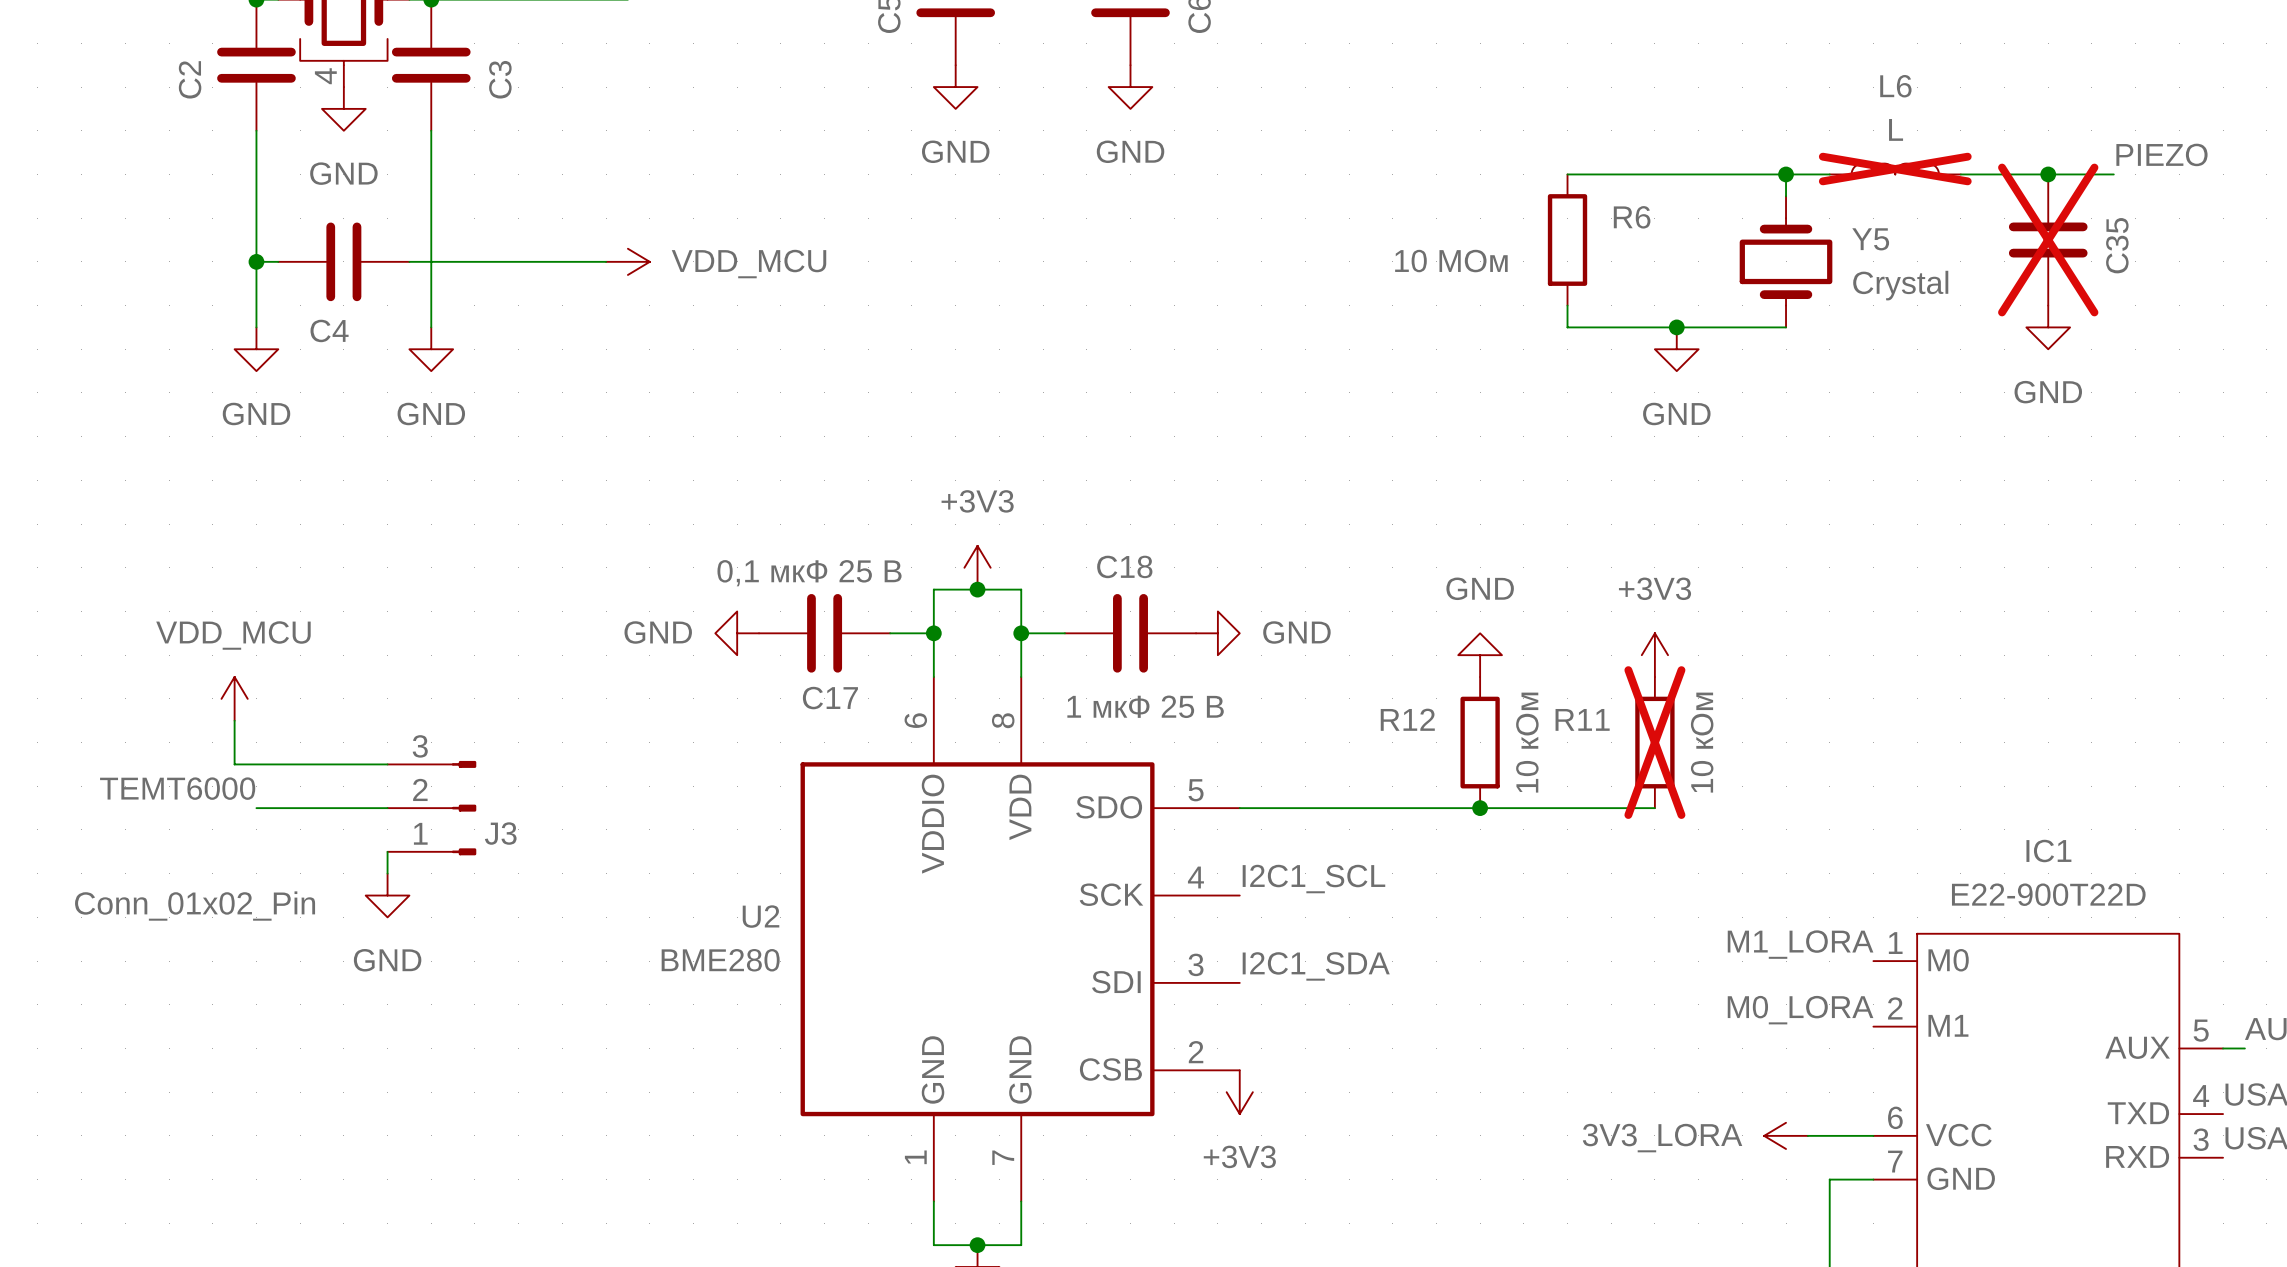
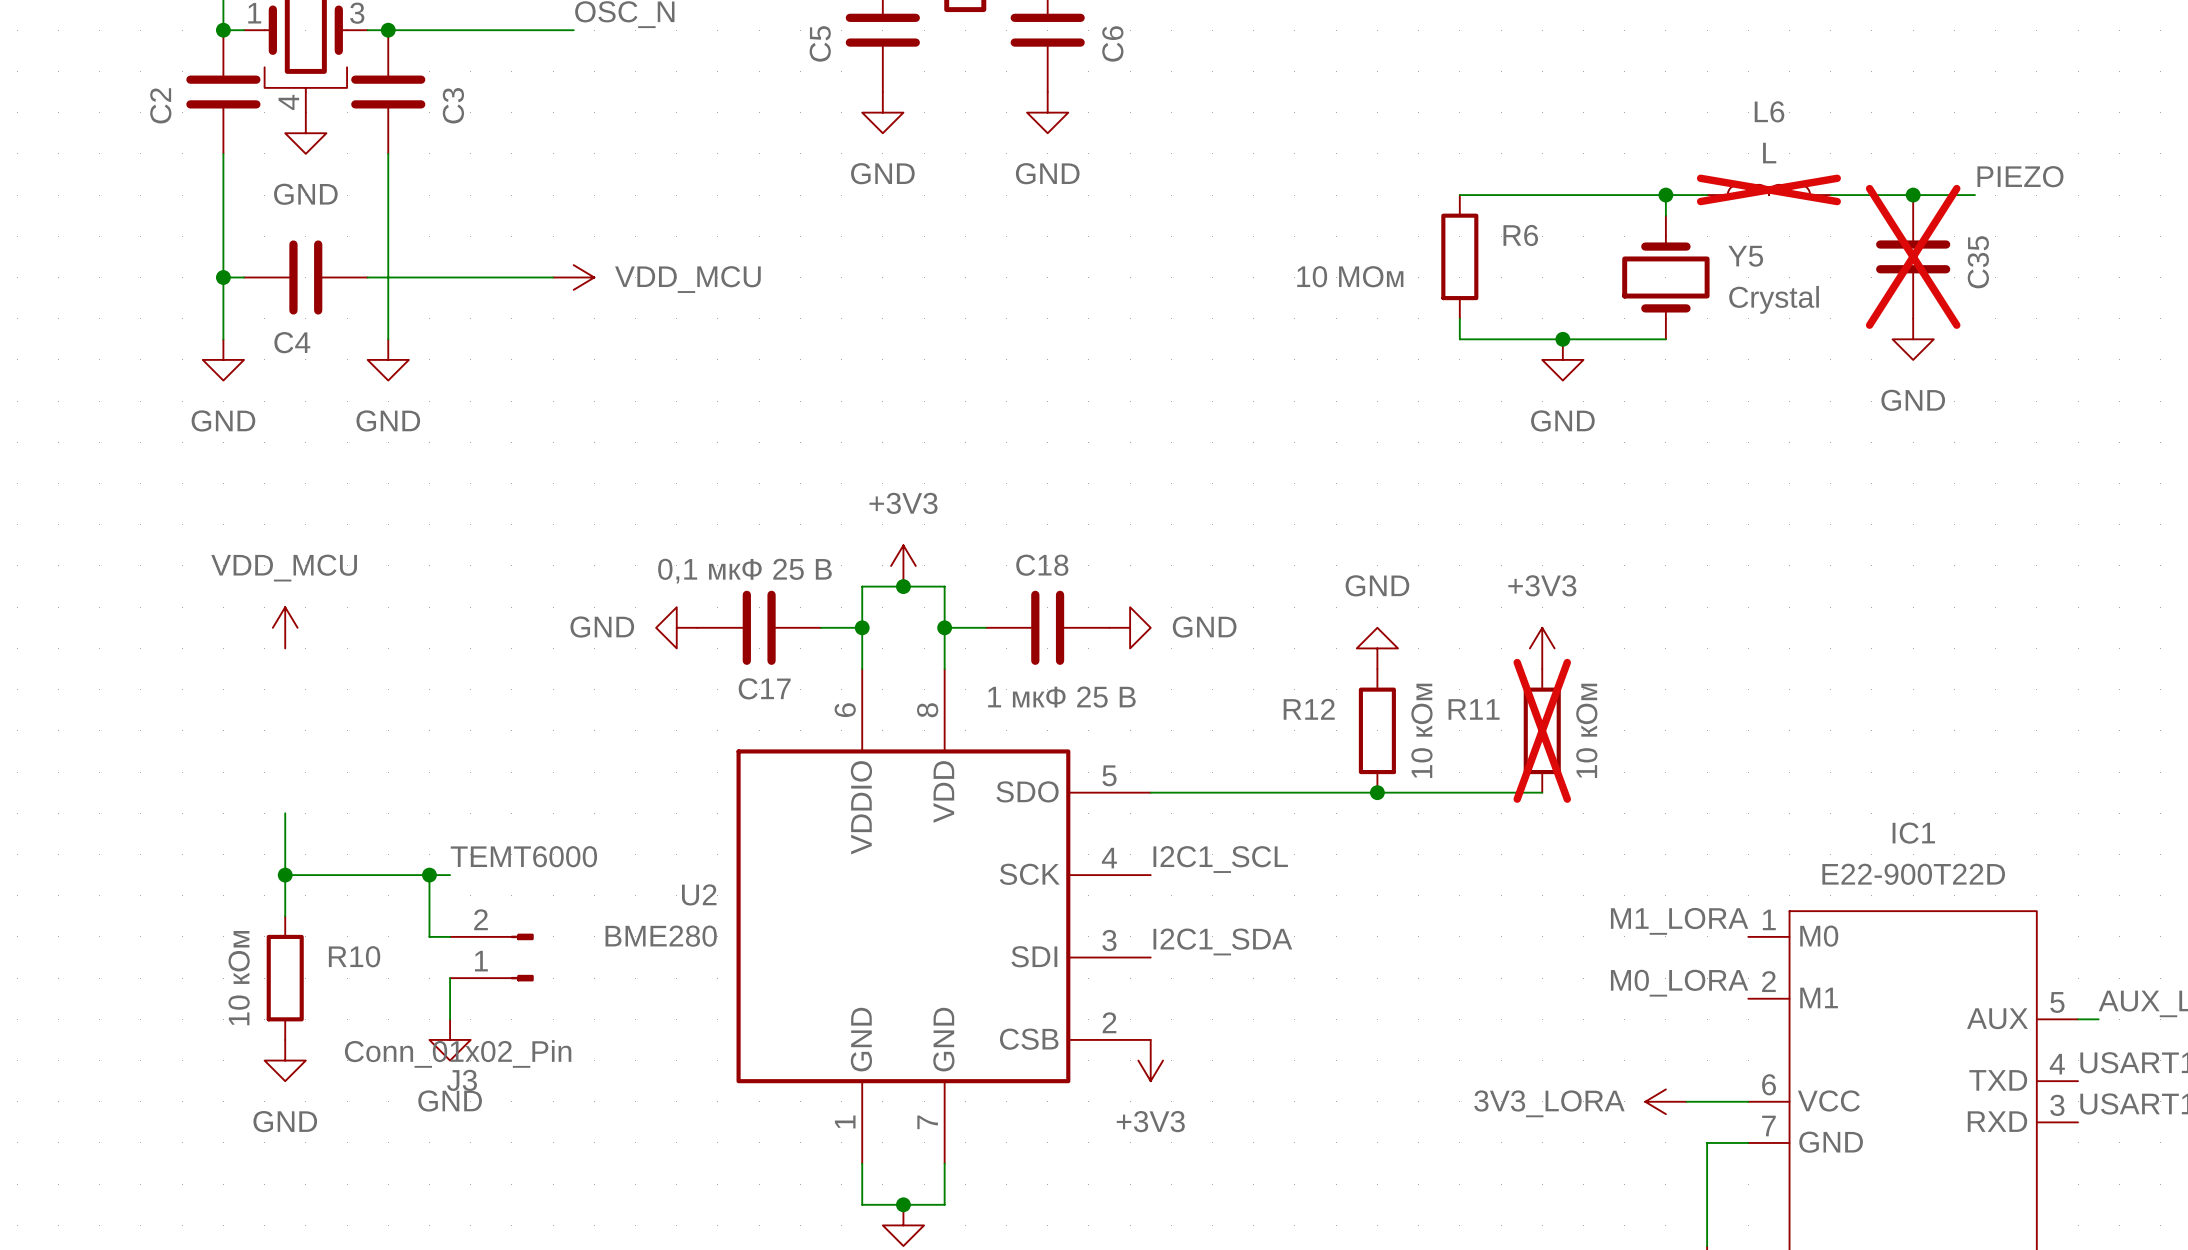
power symbol position: VDD_MCU (234, 698) -> VDD_MCU (285, 627)
wire: (234, 720) (234, 764) (387, 764) -> none
J3 symbol: [387, 760, 477, 856] -> [450, 933, 534, 982]
label position: TEMT6000 (177, 788) -> TEMT6000 (523, 856)
wire: (256, 808) (387, 808) -> none
wire: none -> (285, 813) (285, 916)
J3 name position: J3 (500, 833) -> J3 (462, 1080)
wire: (387, 851) (387, 873) -> none
wire: none -> (285, 875) (450, 875)
junction: none -> (285, 875)
power symbol: GND (387, 895) -> none
wire: none -> (429, 875) (429, 936) (450, 936)
junction: none -> (429, 875)
J3 value position: Conn_01x02_Pin (195, 906) -> Conn_01x02_Pin (458, 1053)
R10: none -> 10 кОм (285, 978)
wire: none -> (450, 978) (450, 1019)
power symbol: none -> GND (450, 1039)
power symbol: none -> GND (285, 1060)

